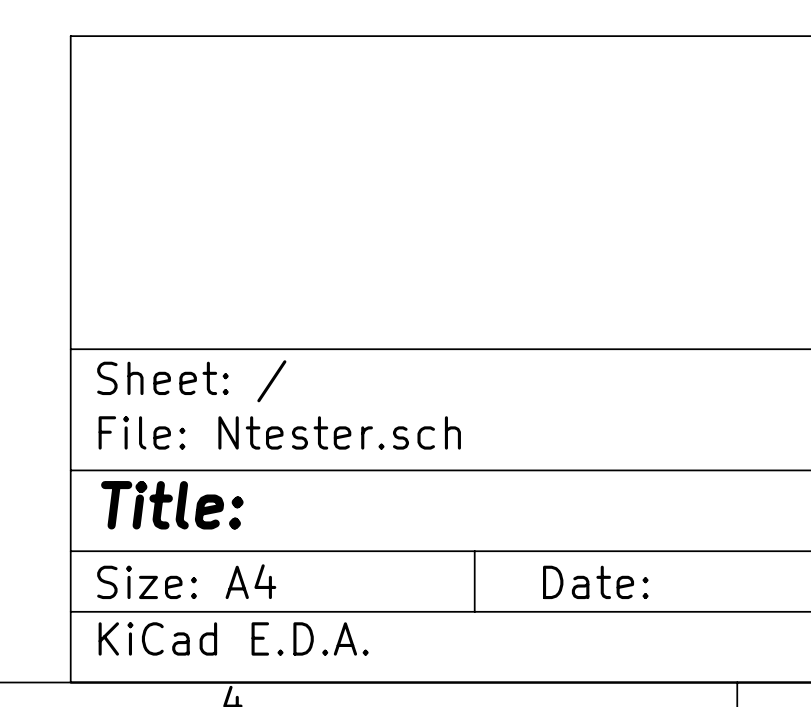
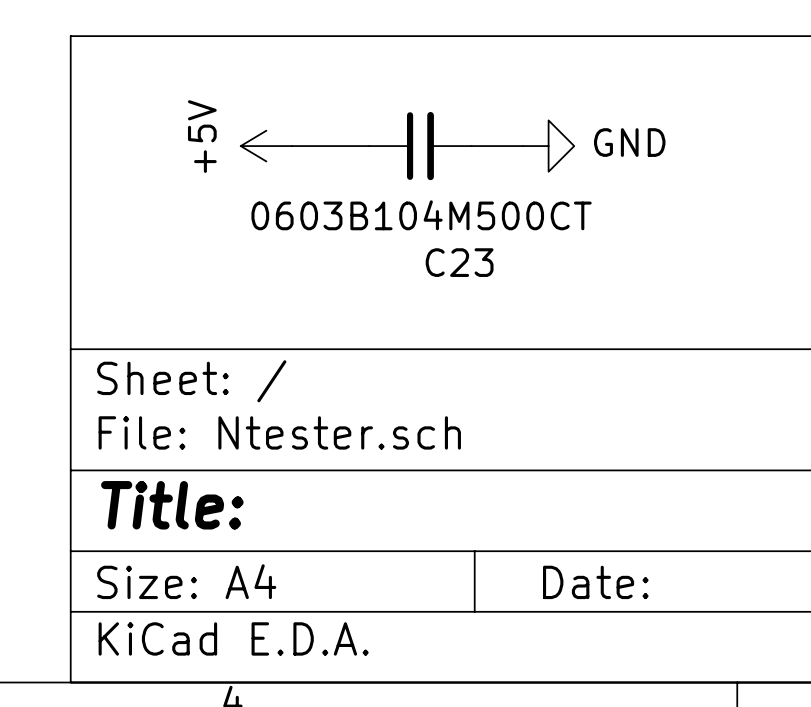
power symbol: none -> +5V (266, 146)
wire: none -> (292, 146) (369, 146)
C23: none -> 0603B104M500CT (420, 146)
wire: none -> (471, 146) (522, 146)
power symbol: none -> GND (548, 146)

